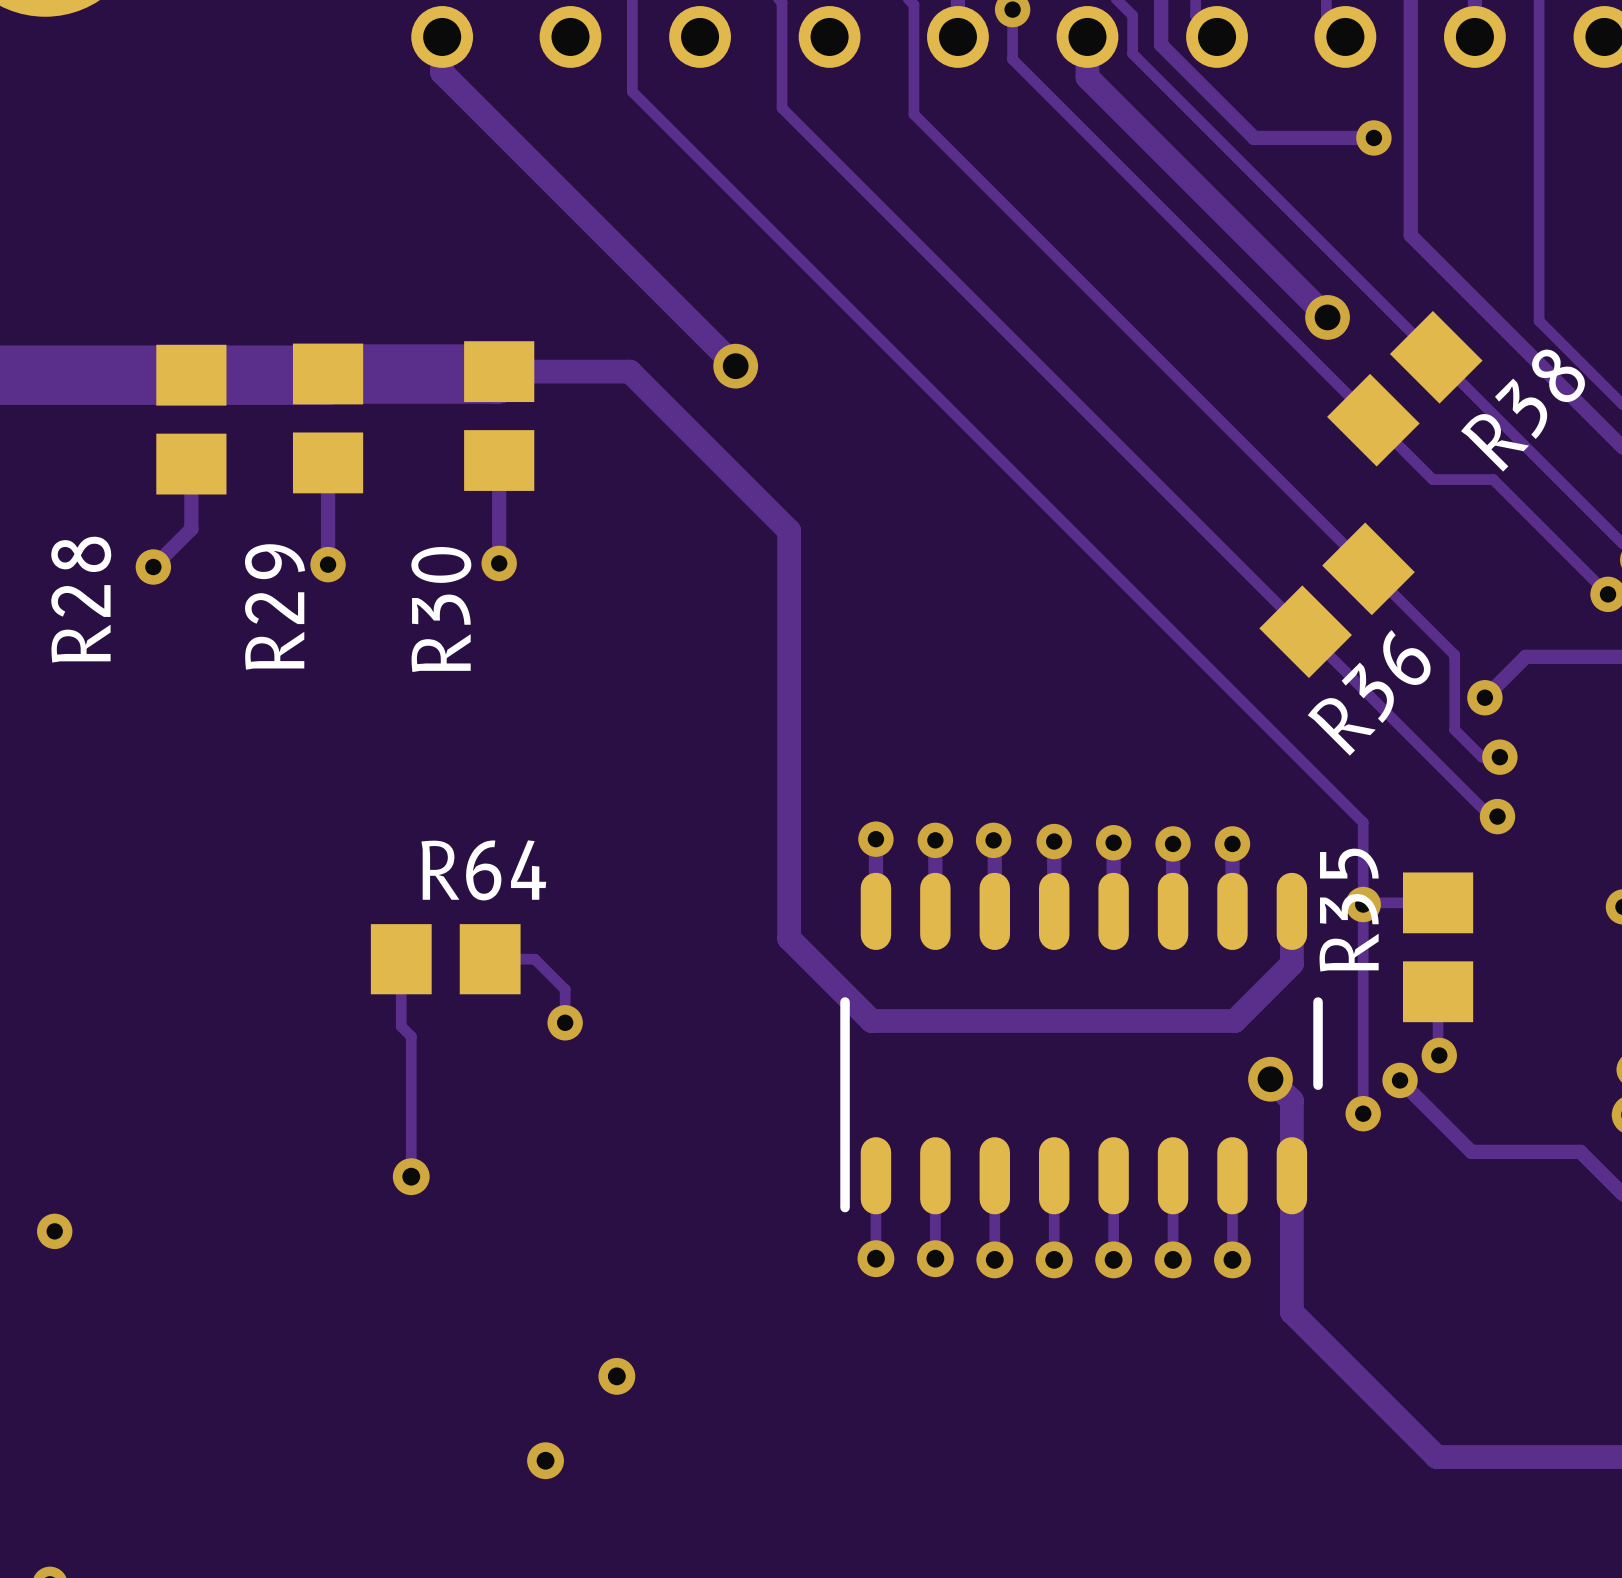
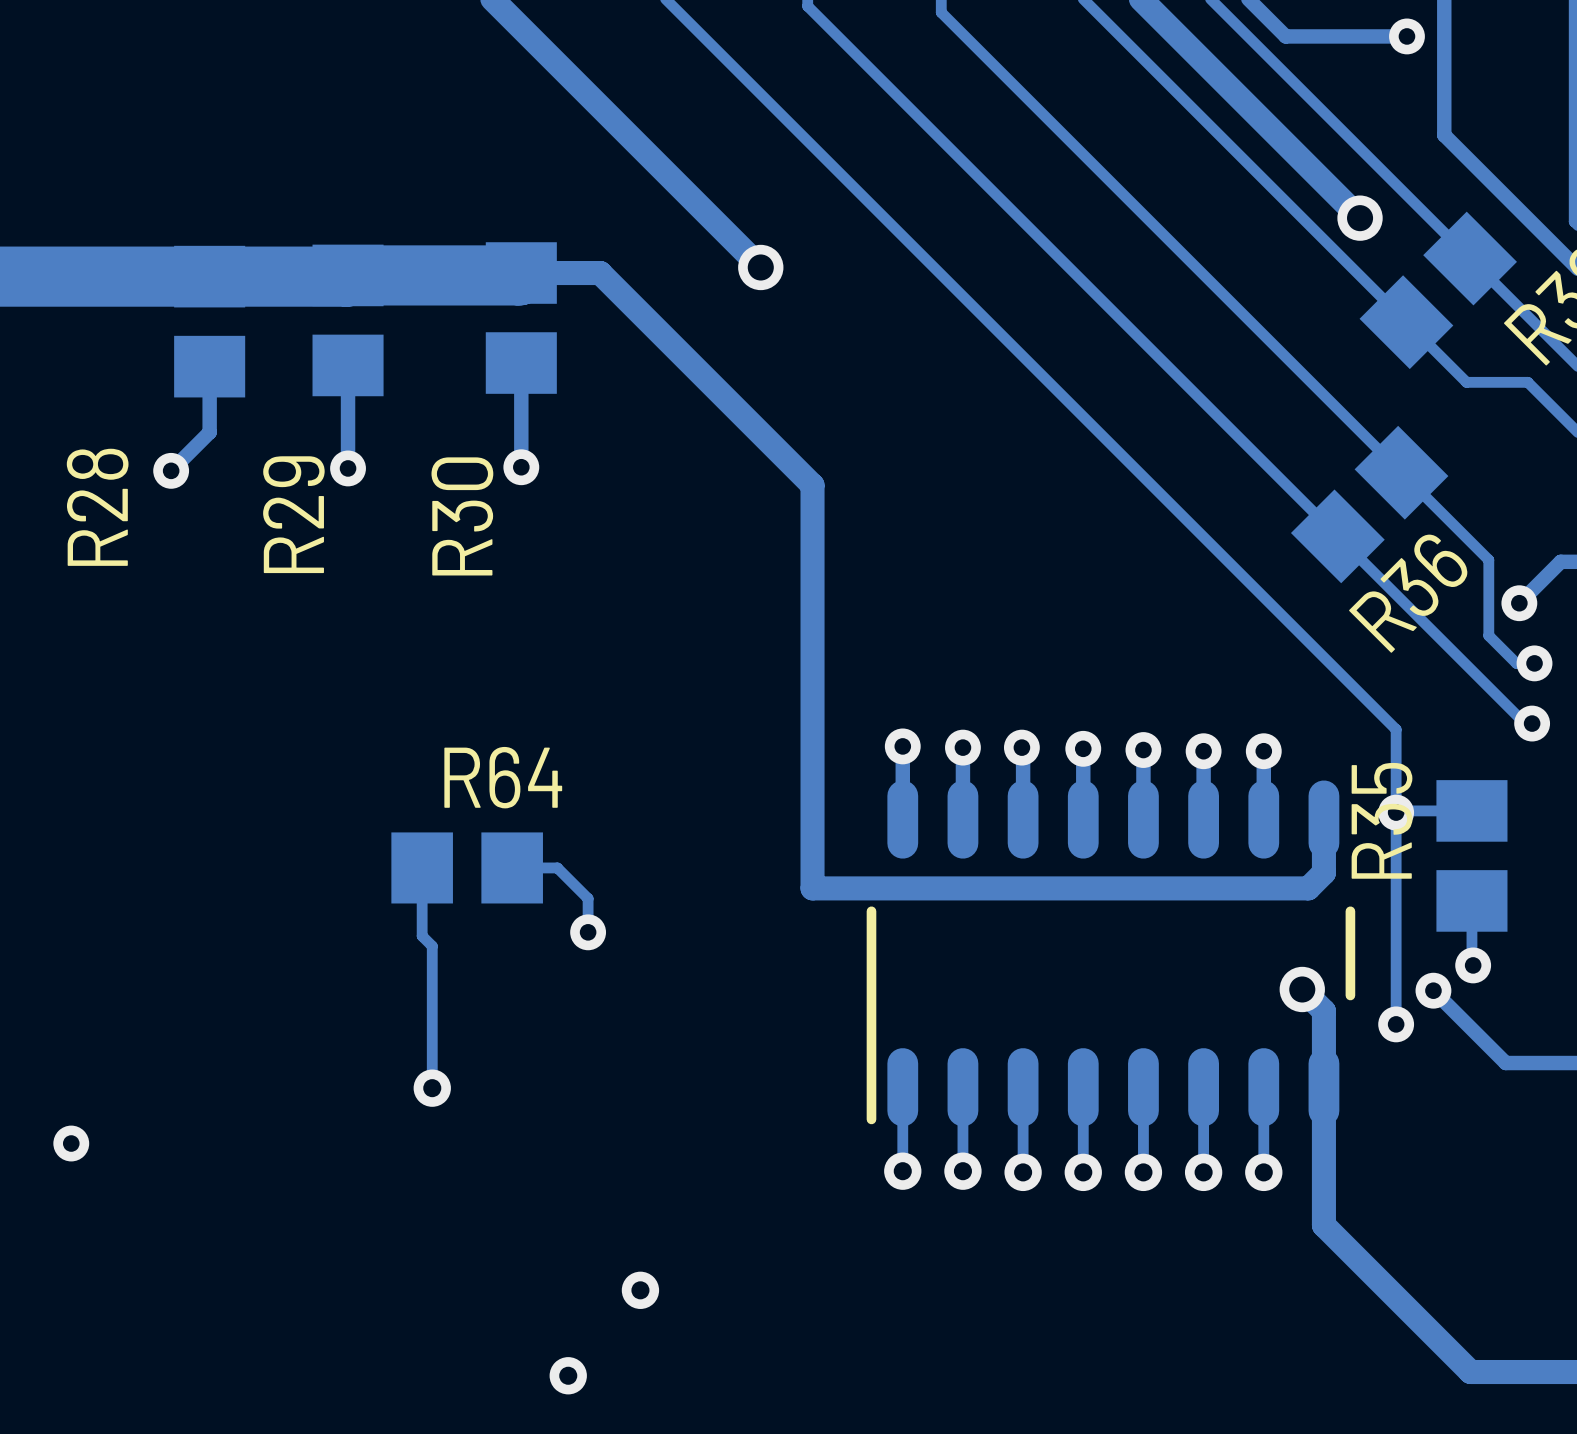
track: (577, 371) (629, 371) (789, 530) (789, 938) (871, 1021) (1234, 1021) (1276, 979) -> (600, 273) (812, 485) (812, 888) (1308, 888)

